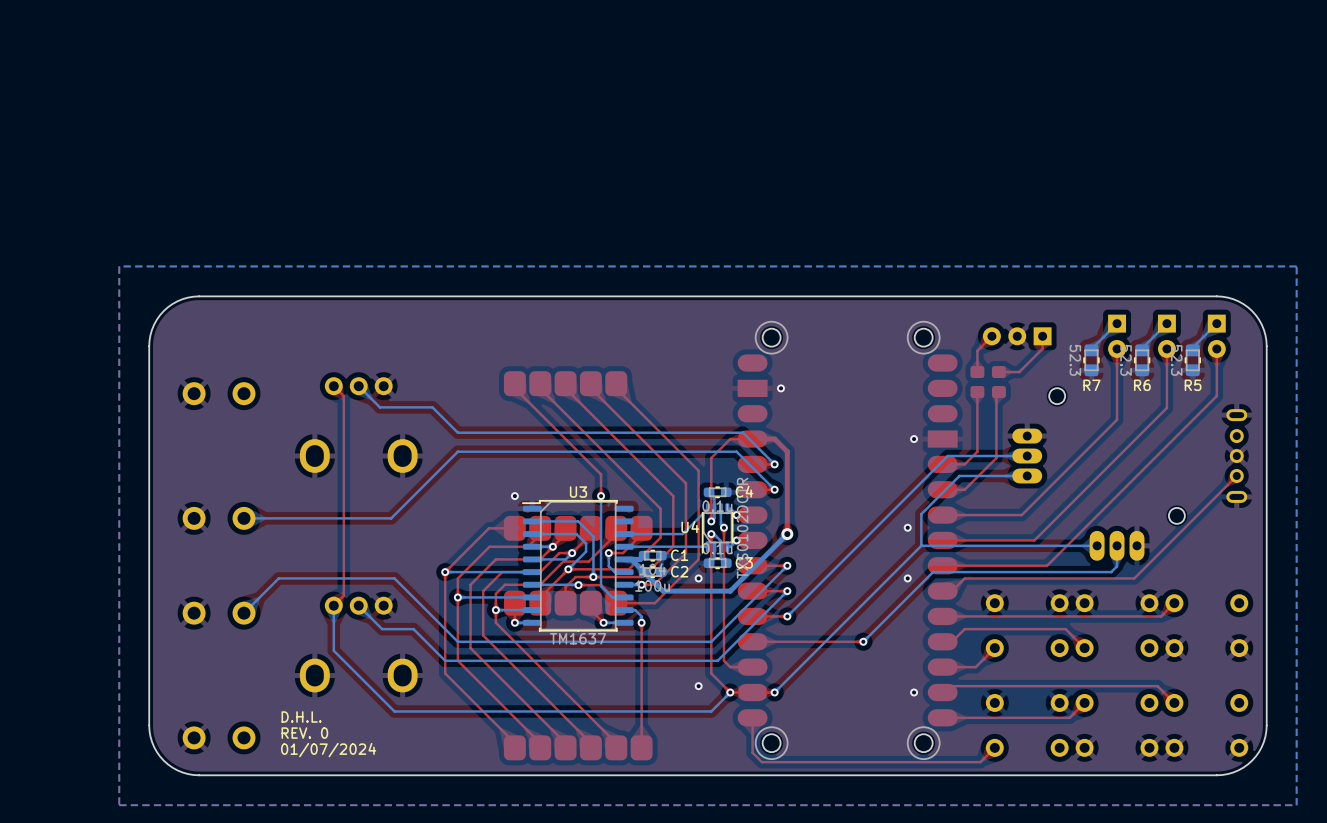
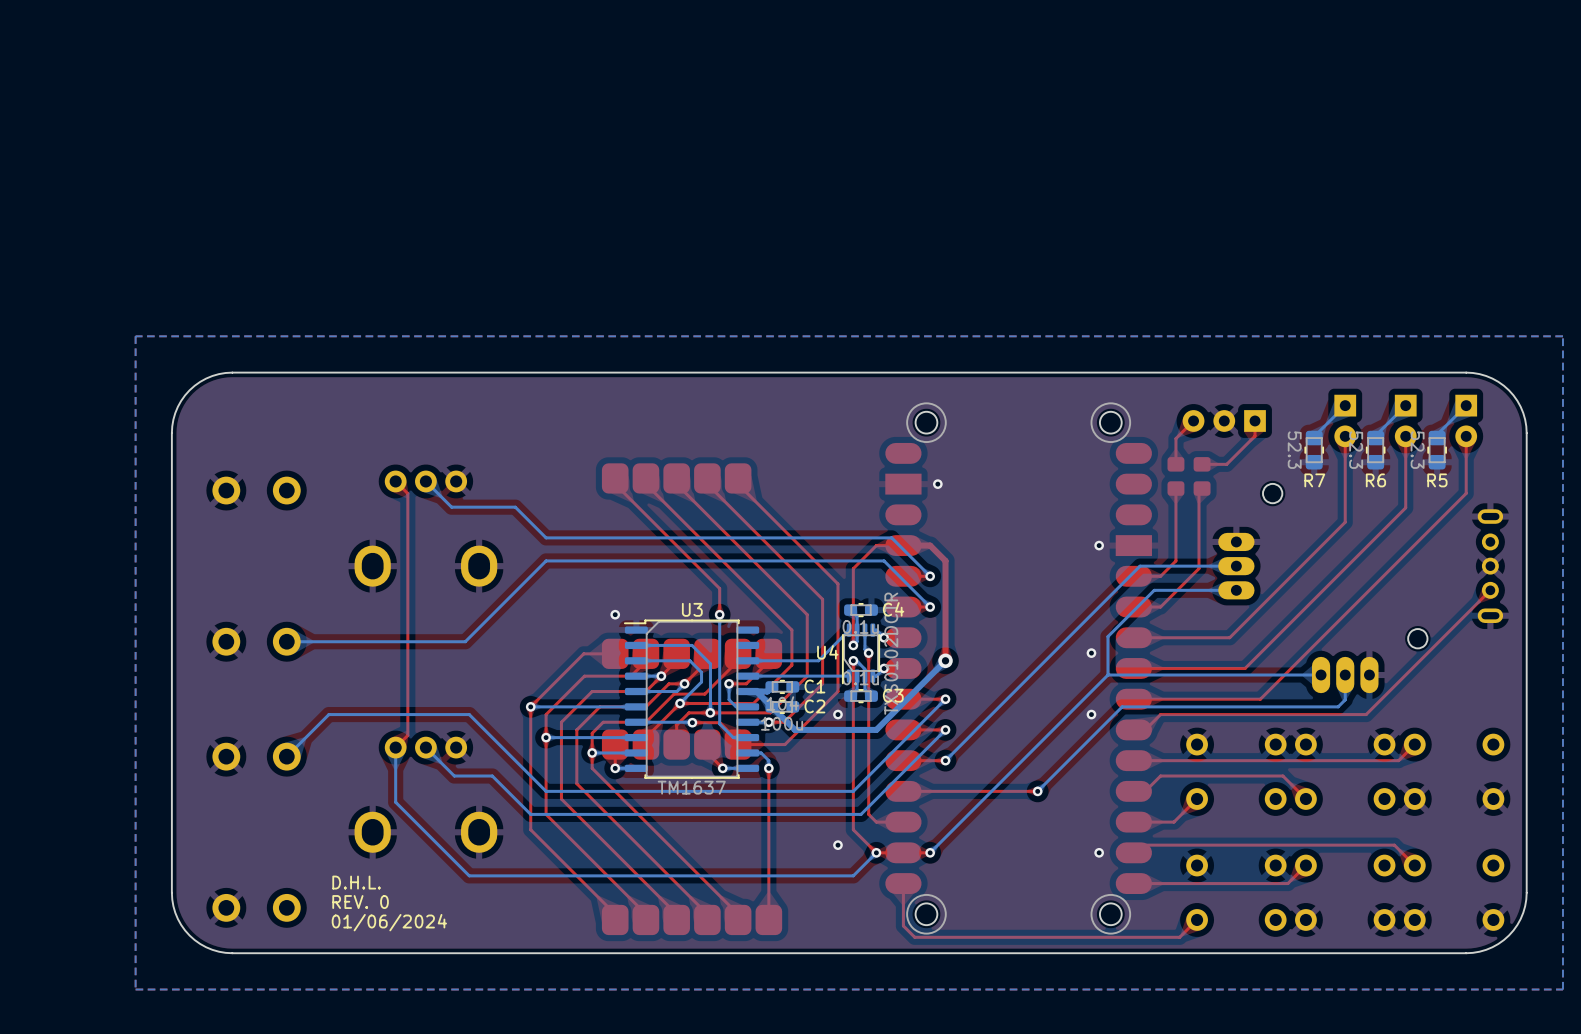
text: 01/07/2024 (328, 750) -> 01/06/2024 (389, 922)

